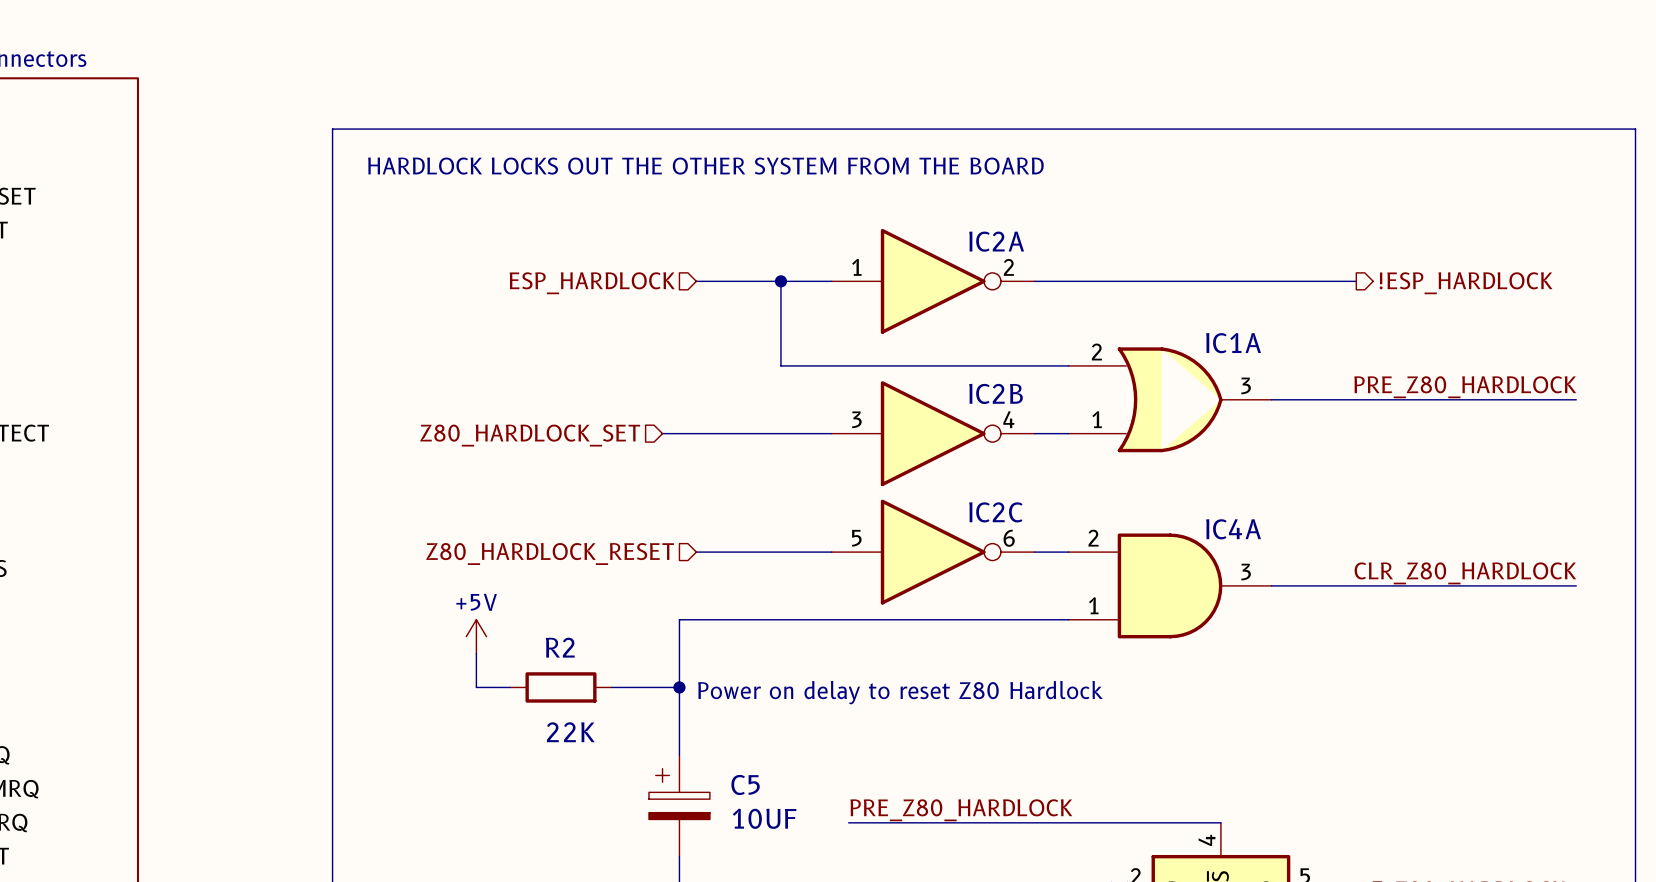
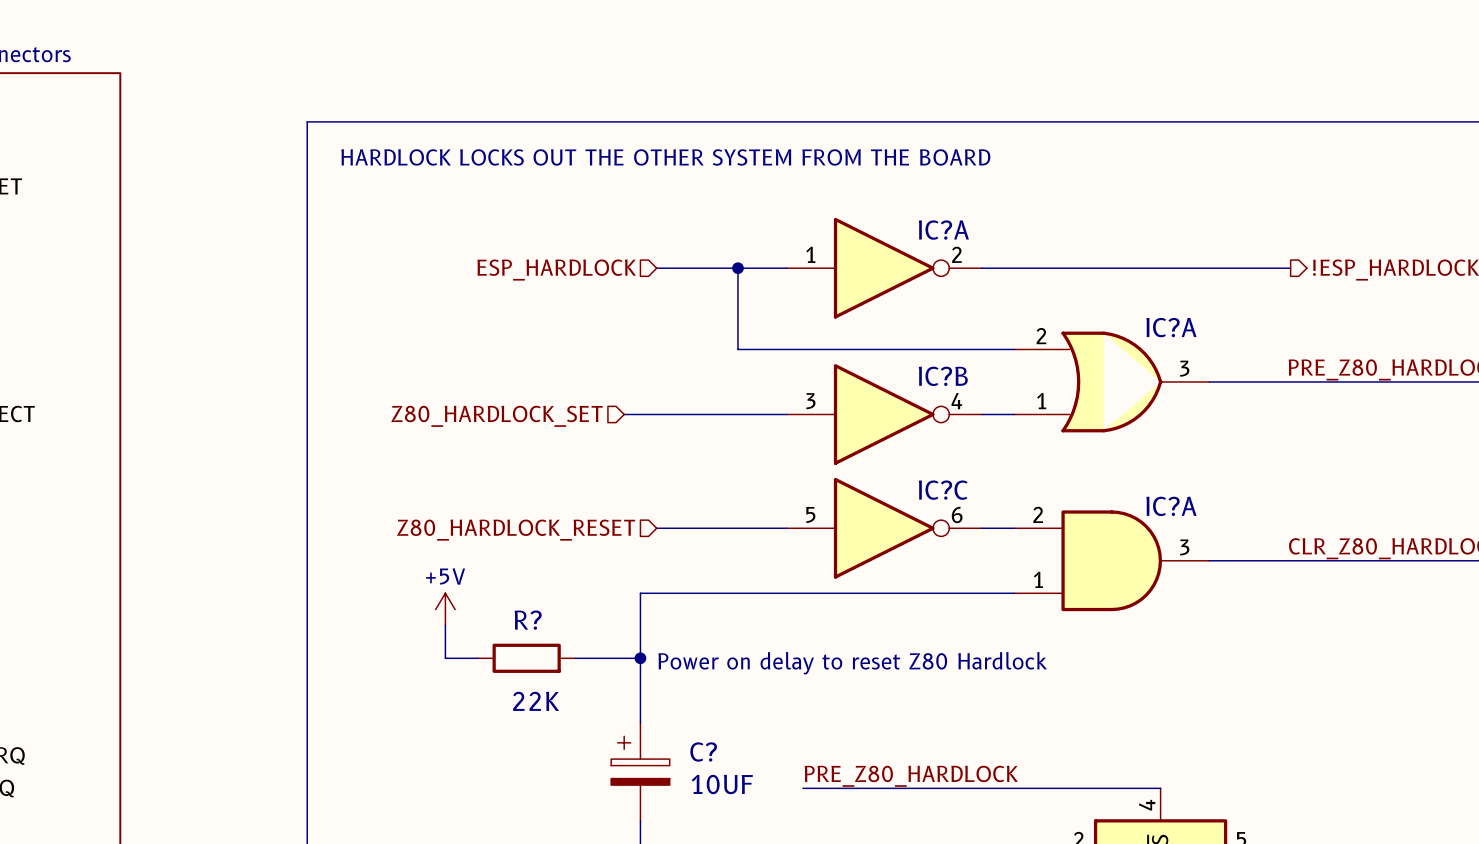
IC2A name: IC2A (996, 241) -> IC?A (943, 230)
IC1A name: IC1A (1233, 343) -> IC?A (1171, 327)
IC2B name: IC2B (996, 393) -> IC?B (943, 376)
IC2C name: IC2C (995, 512) -> IC?C (943, 490)
IC4A name: IC4A (1233, 529) -> IC?A (1171, 506)
R2 name: R2 (560, 647) -> R? (528, 620)
C5 name: C5 (745, 784) -> C? (703, 751)

